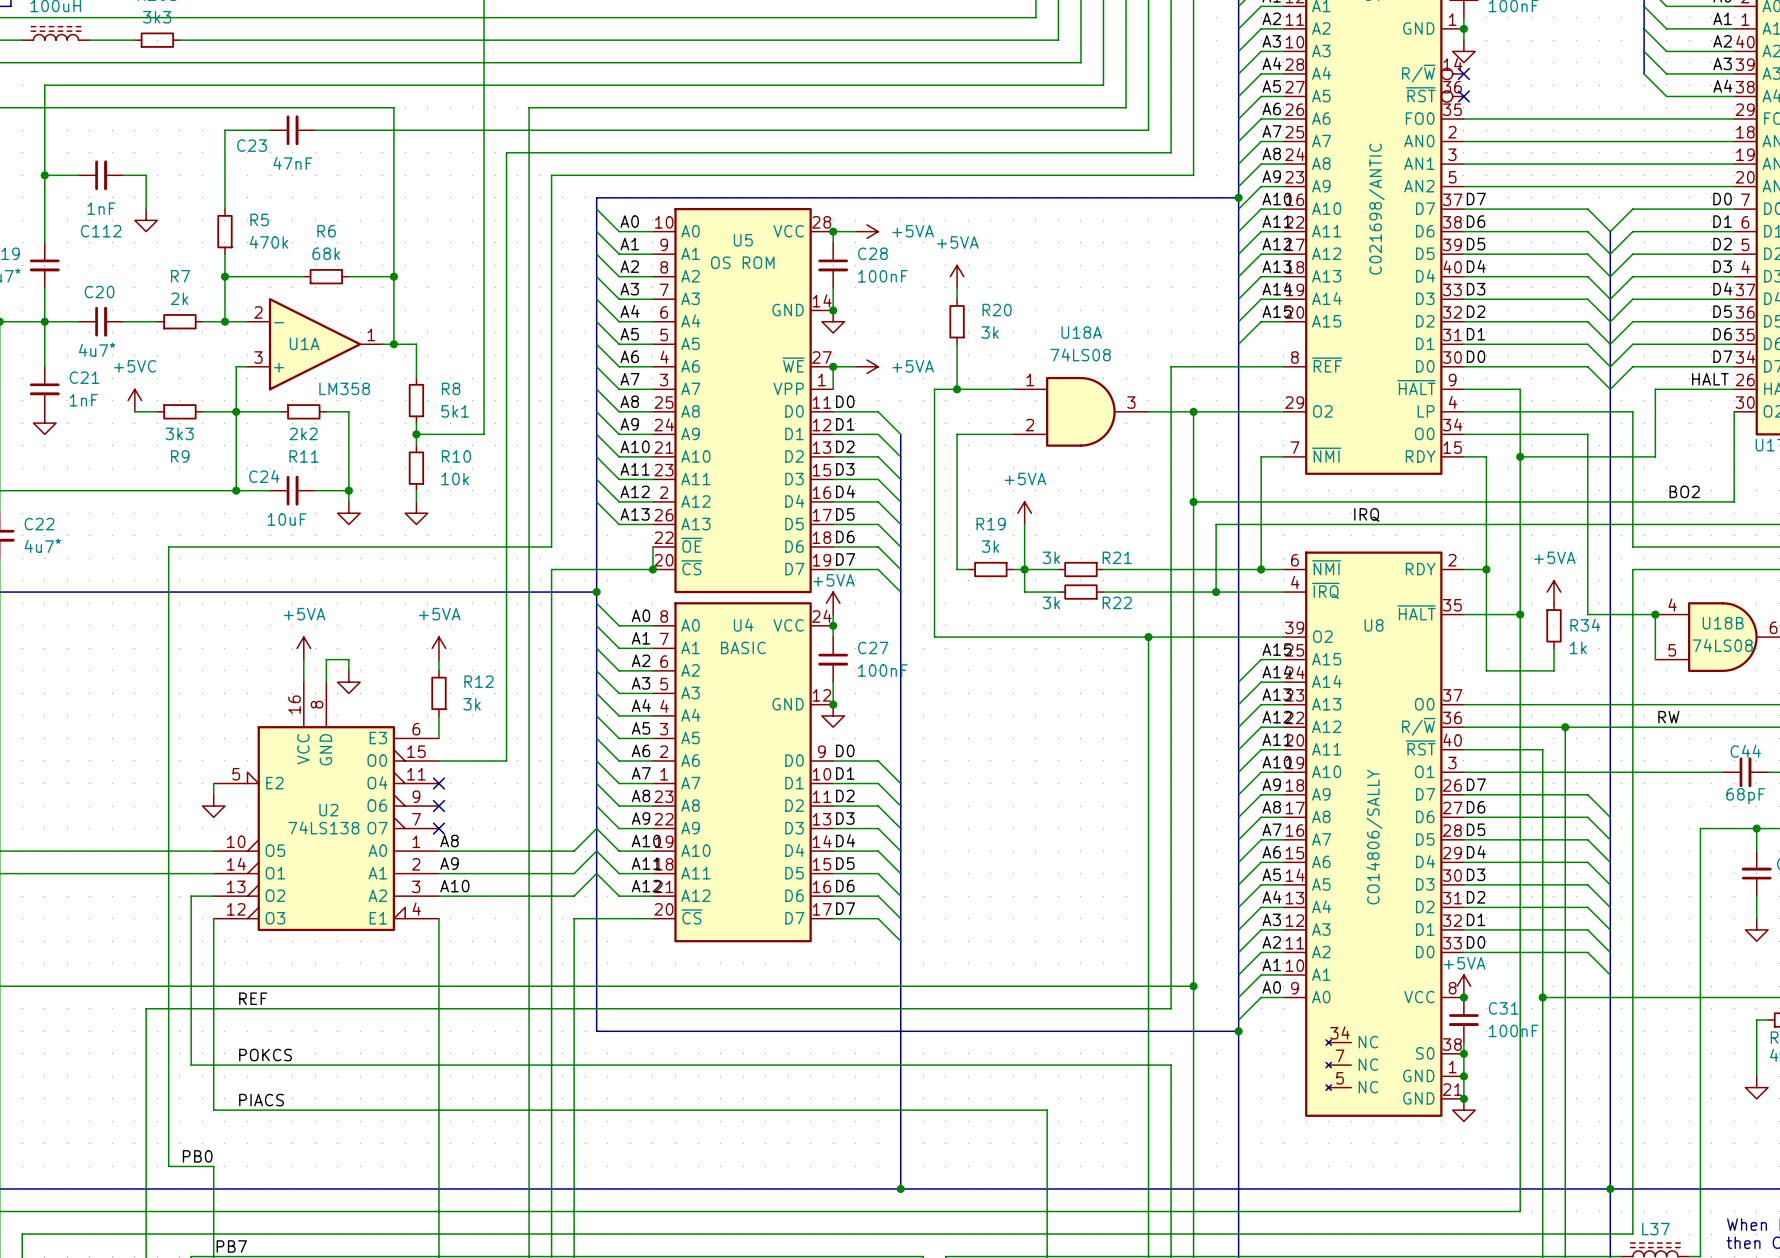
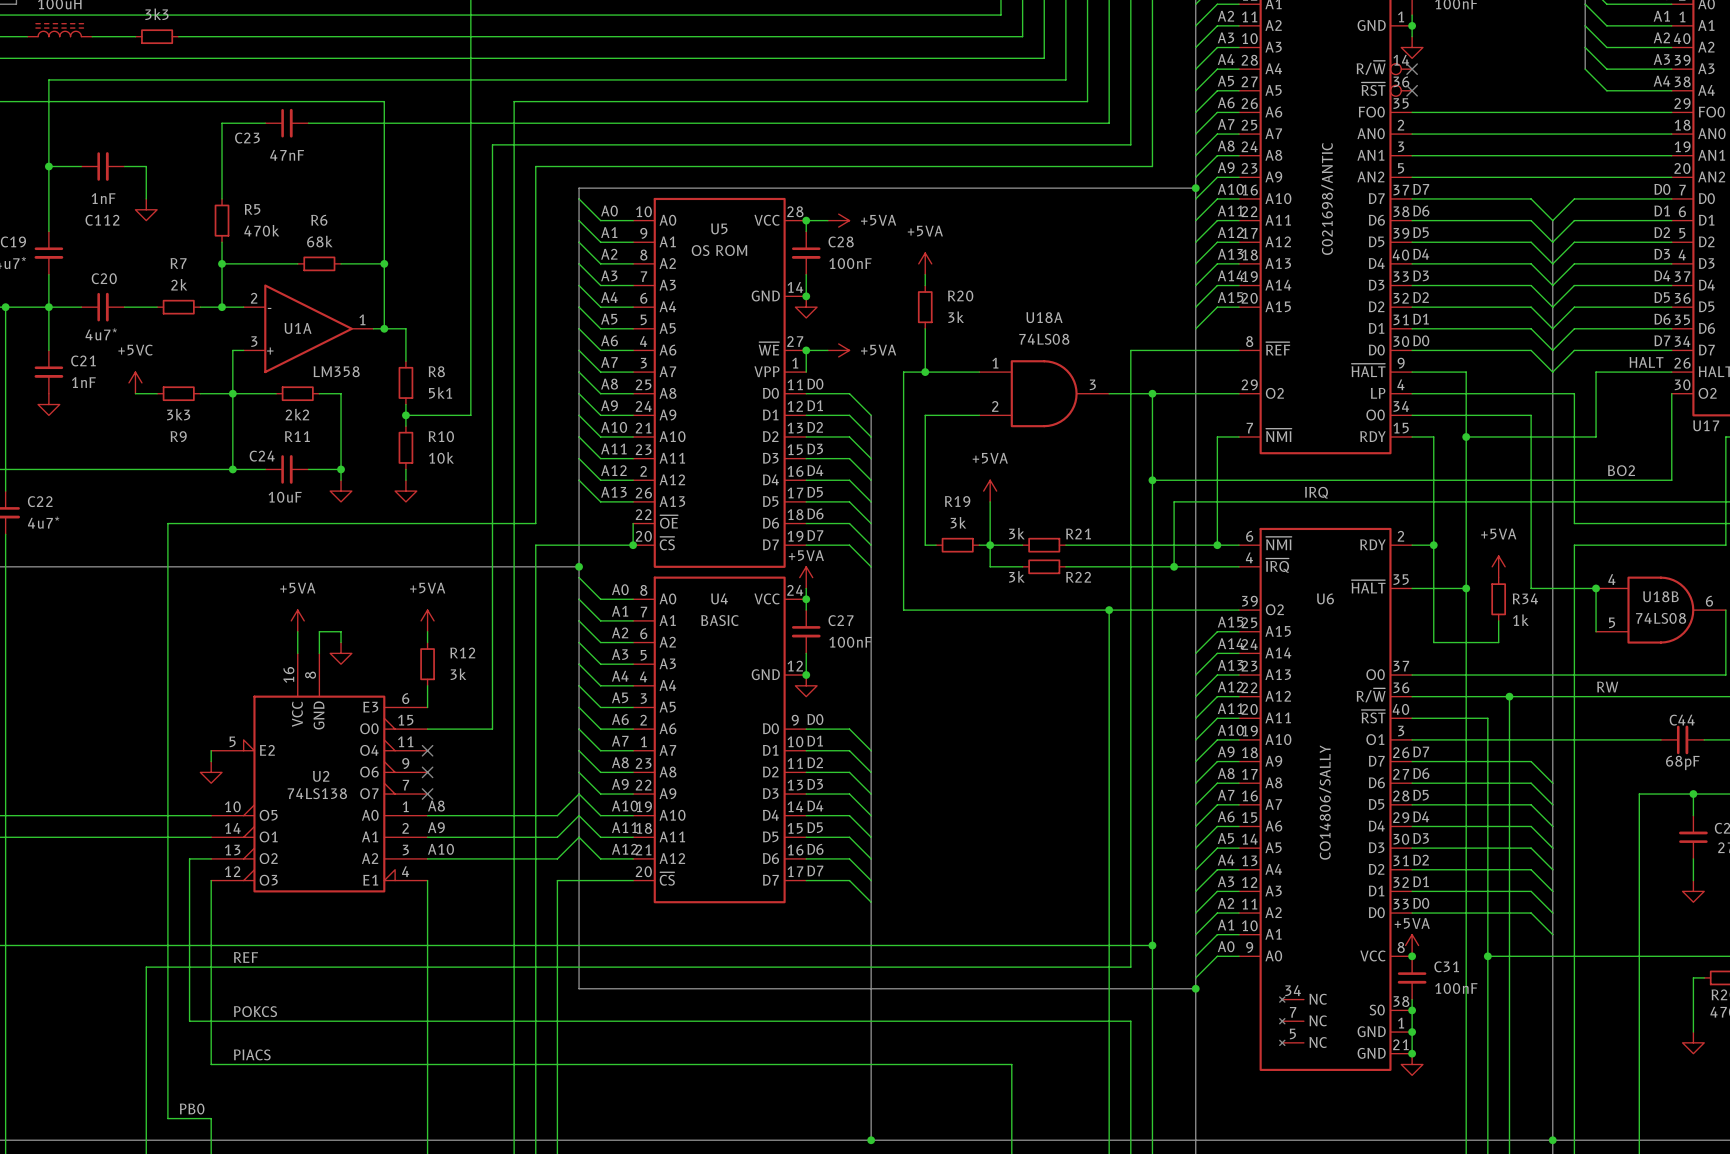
U8 name: U8 (1374, 625) -> U6 (1325, 598)

